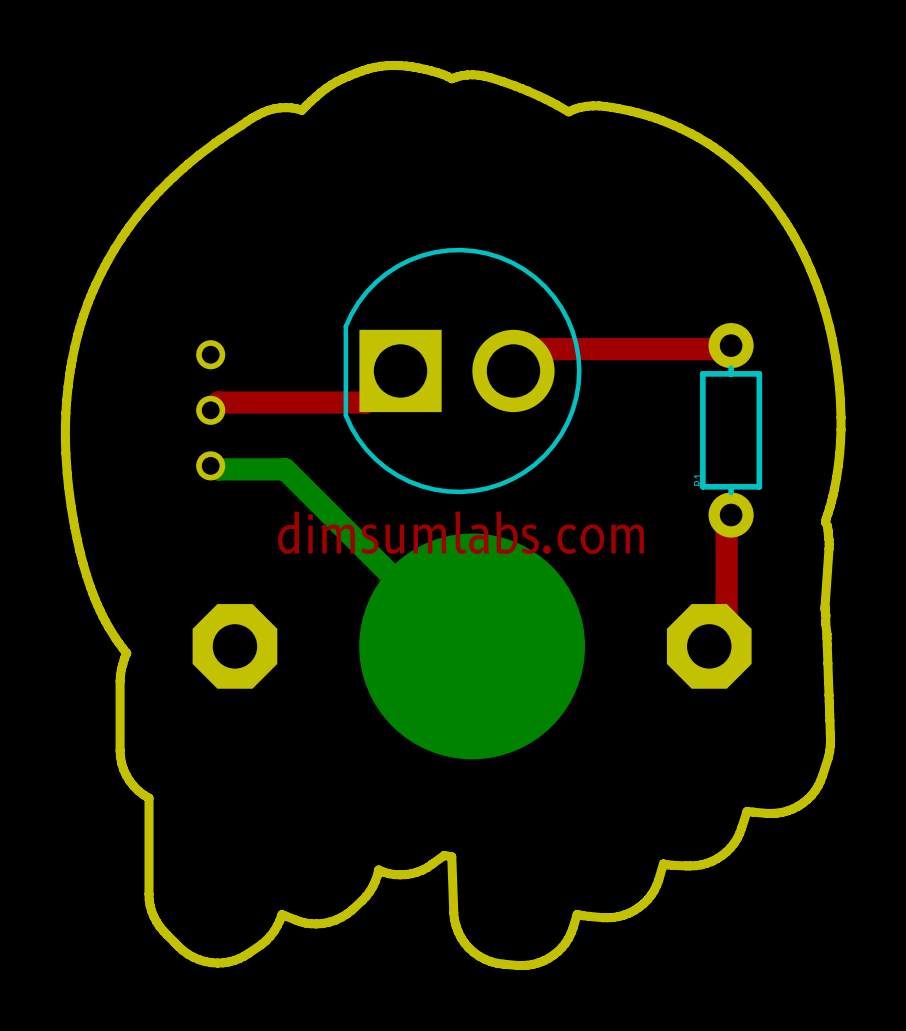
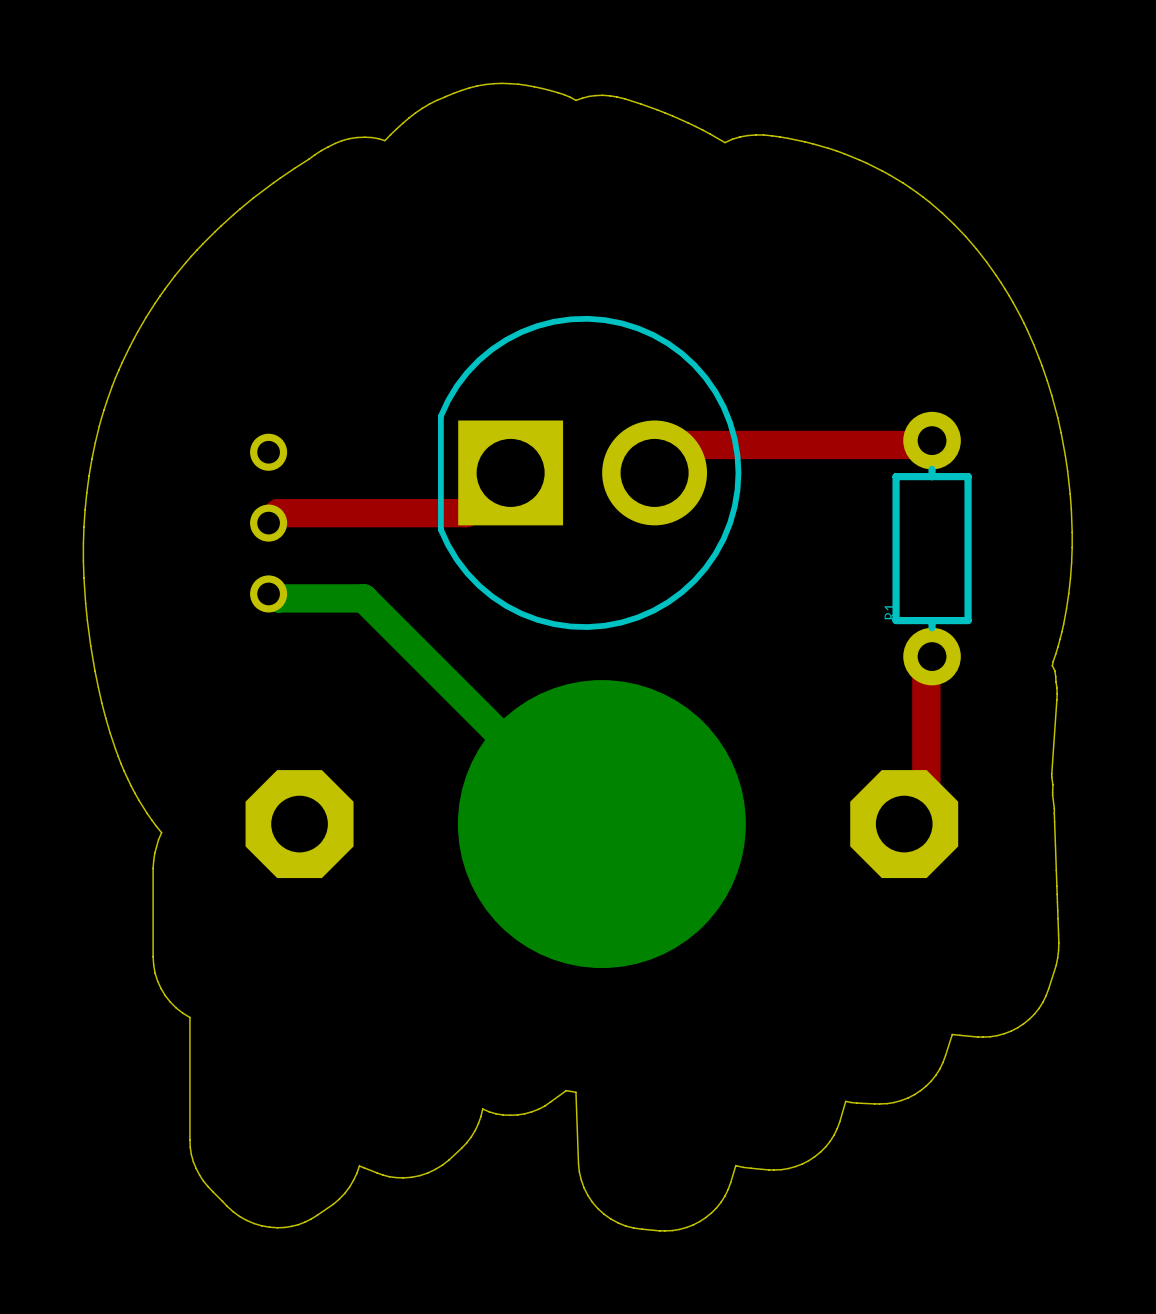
board edge width: thick (393, 65) (368, 68) (342, 78) (325, 88) (301, 110) (280, 107) (262, 112) (219, 139) (183, 168) (145, 206) (114, 249) (90, 296) (74, 347) (68, 386) (65, 426) (67, 473) (71, 506) (79, 551) (92, 593) (108, 627) (126, 653) (120, 681) (120, 756) (123, 769) (129, 781) (138, 790) (149, 798) (150, 905) (159, 926) (178, 946) (187, 954) (205, 961) (223, 962) (244, 956) (270, 936) (281, 914) (310, 923) (335, 920) (347, 913) (366, 896) (372, 886) (378, 869) (394, 874) (411, 873) (427, 867) (444, 855) (451, 856) (454, 919) (461, 937) (468, 947) (479, 956) (497, 963) (521, 965) (538, 962) (553, 955) (565, 943) (577, 914) (612, 917) (629, 913) (639, 907) (654, 890) (663, 863) (695, 865) (712, 861) (722, 855) (737, 838) (746, 811) (776, 813) (793, 808) (803, 803) (818, 786) (828, 756) (830, 739) (825, 606) (829, 544) (825, 522) (834, 489) (839, 453) (839, 387) (832, 339) (821, 298) (805, 259) (788, 227) (765, 195) (739, 167) (708, 143) (674, 125) (637, 112) (605, 106) (586, 106) (568, 111) (527, 90) (490, 77) (472, 74) (451, 78) (425, 69) (393, 65) -> thin (501, 83) (469, 87) (436, 100) (415, 112) (384, 140) (371, 137) (357, 137) (335, 143) (280, 178) (233, 214) (185, 262) (146, 317) (115, 378) (95, 442) (86, 492) (83, 543) (85, 603) (90, 645) (101, 702) (118, 756) (138, 799) (161, 832) (154, 853) (153, 868) (153, 965) (157, 981) (165, 995) (176, 1008) (189, 1017) (191, 1154) (203, 1181) (227, 1206) (239, 1216) (261, 1225) (284, 1227) (298, 1224) (311, 1218) (333, 1204) (344, 1193) (353, 1180) (359, 1165) (382, 1175) (396, 1177) (411, 1177) (427, 1173) (442, 1165) (466, 1142) (475, 1130) (482, 1109) (503, 1114) (524, 1113) (545, 1105) (566, 1090) (575, 1092) (579, 1171) (587, 1195) (597, 1208) (610, 1218) (633, 1228) (664, 1230) (686, 1227) (705, 1217) (721, 1202) (728, 1189) (735, 1165) (781, 1169) (802, 1164) (814, 1156) (825, 1147) (834, 1135) (845, 1101) (887, 1103) (908, 1097) (920, 1090) (931, 1080) (939, 1069) (952, 1034) (990, 1036) (1011, 1031) (1023, 1023) (1034, 1014) (1042, 1002) (1056, 965) (1058, 942) (1051, 773) (1057, 693) (1054, 670) (1052, 665) (1063, 624) (1070, 578) (1072, 532) (1070, 494) (1061, 432) (1047, 380) (1027, 330) (1005, 289) (976, 248) (942, 213) (903, 183) (859, 159) (812, 143) (771, 135) (747, 135) (725, 142) (672, 115) (625, 98) (602, 95) (575, 100) (542, 88) (501, 83)
text: dimsumlabs.com (460, 532) -> none

